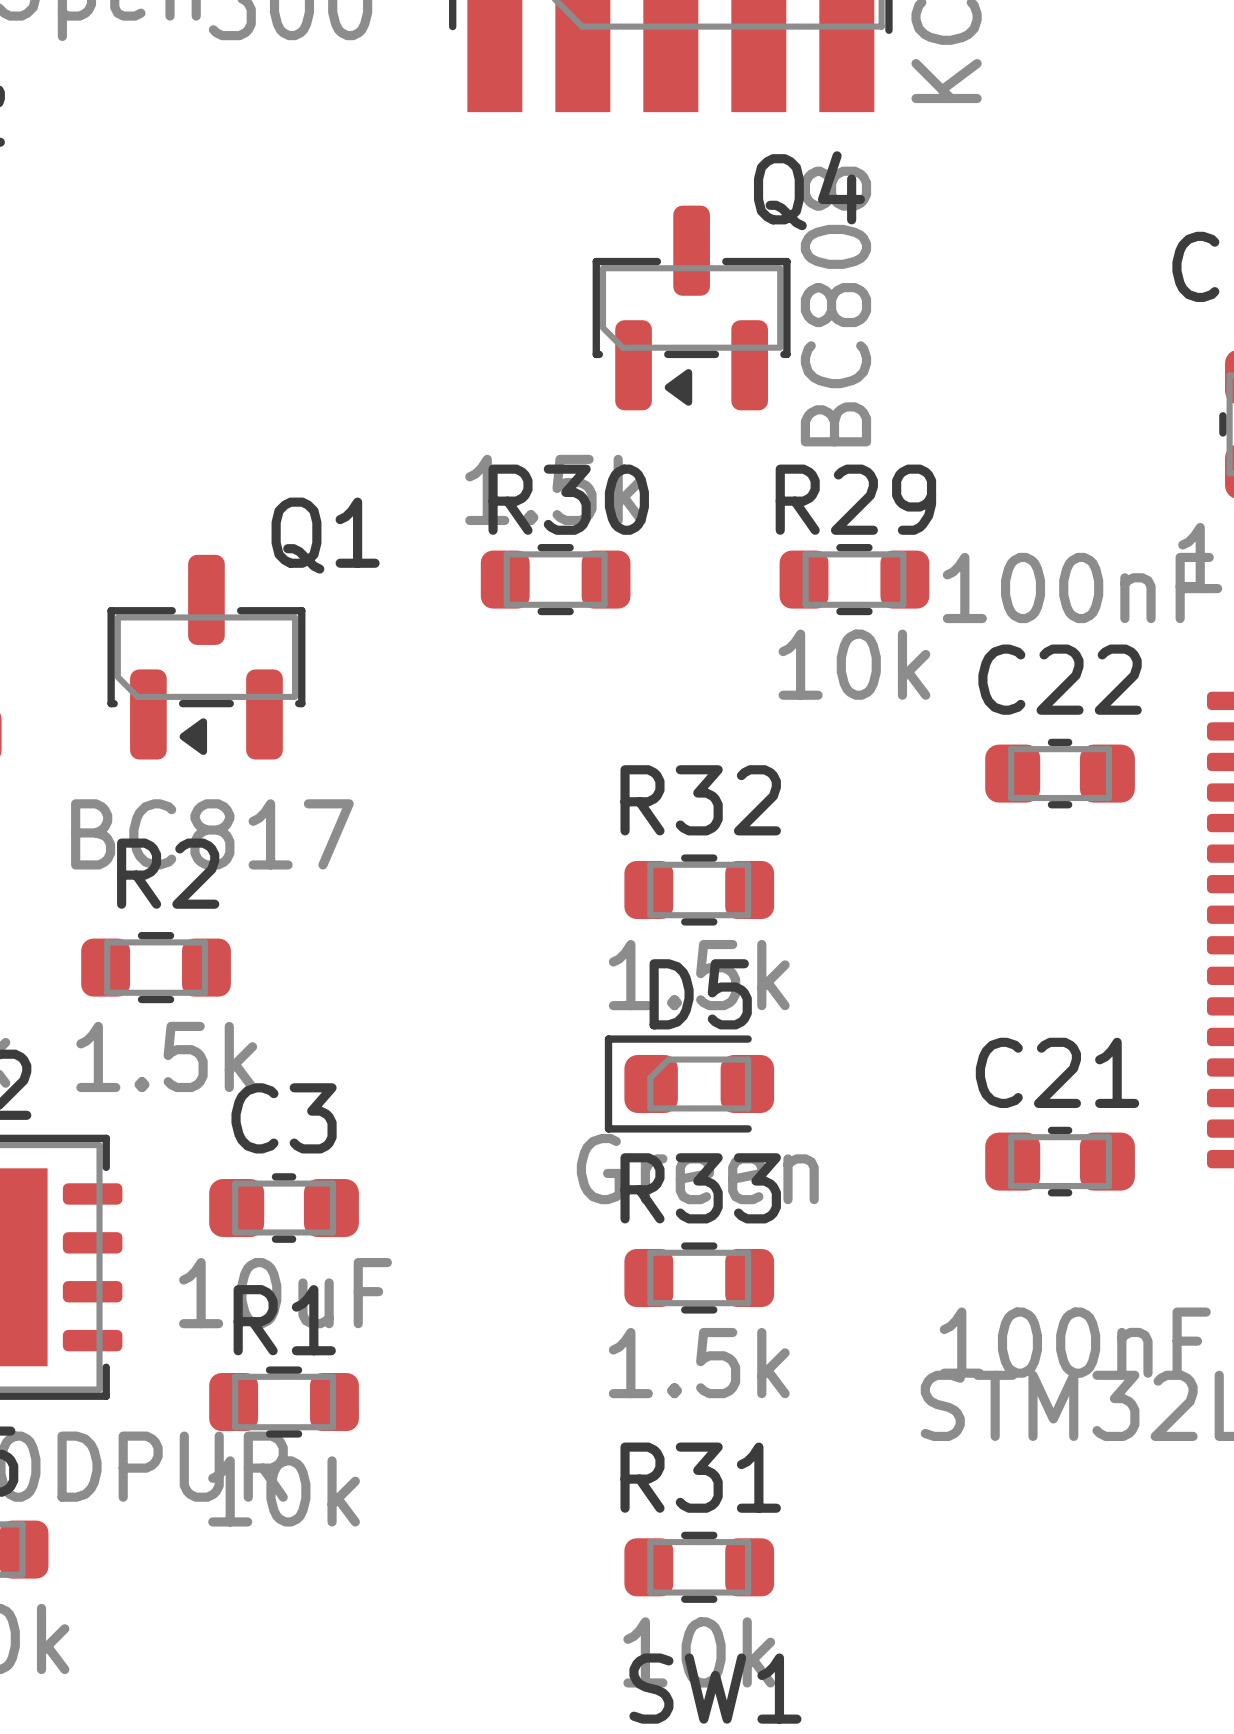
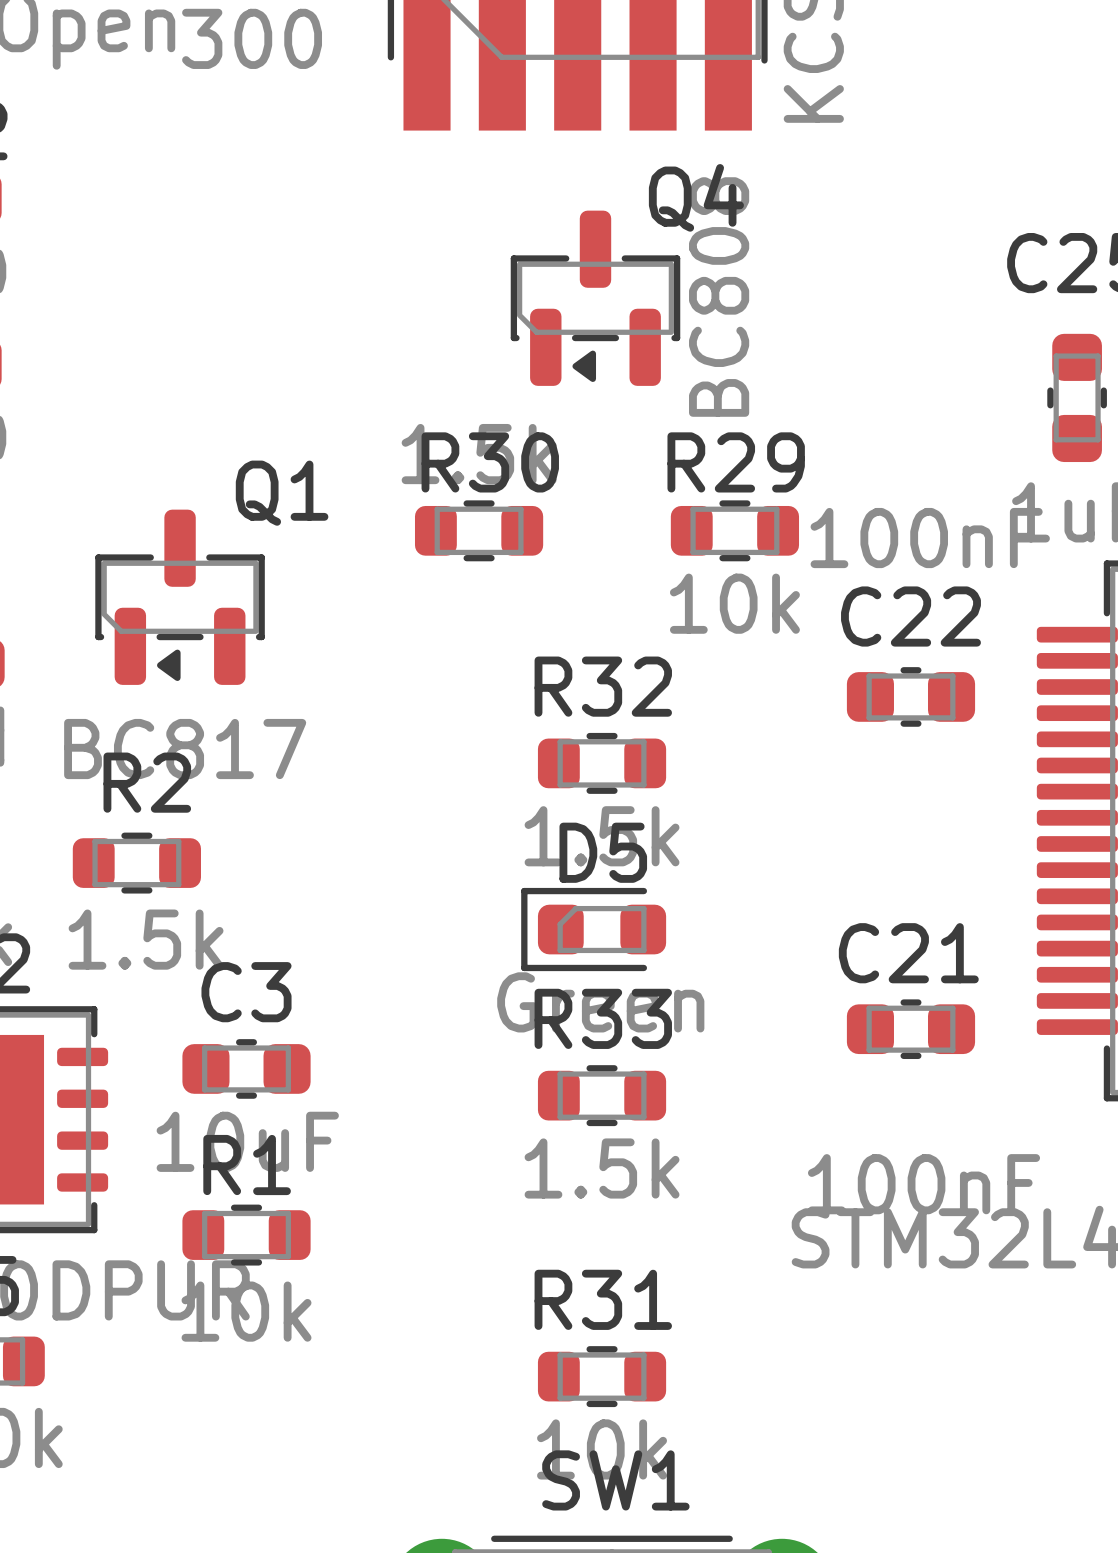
R32 position: (699, 889) -> (602, 763)
D5 position: (689, 1083) -> (593, 929)
R33 position: (699, 1277) -> (602, 1095)

